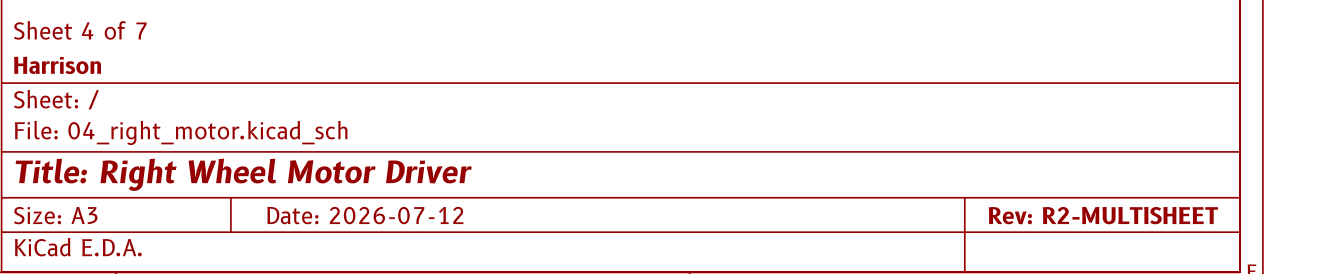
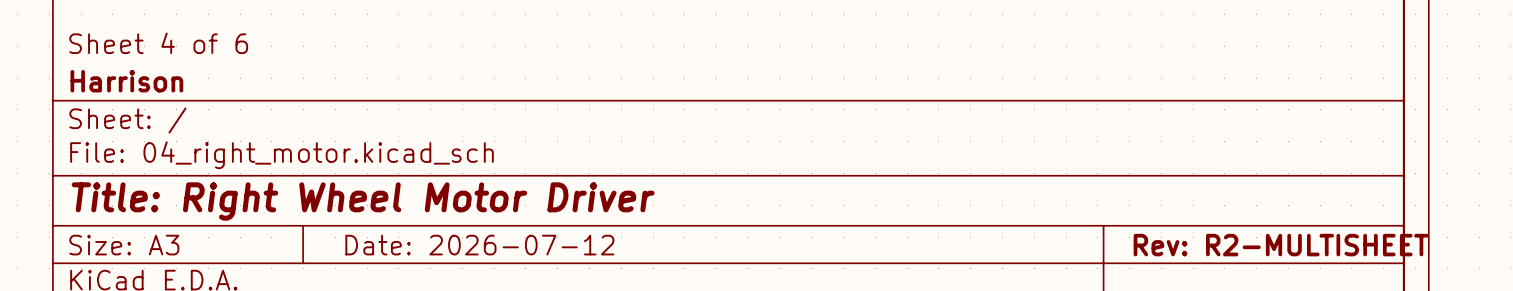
title block: Sheet 4 of 7 (80, 30) -> Sheet 4 of 6 (158, 43)

